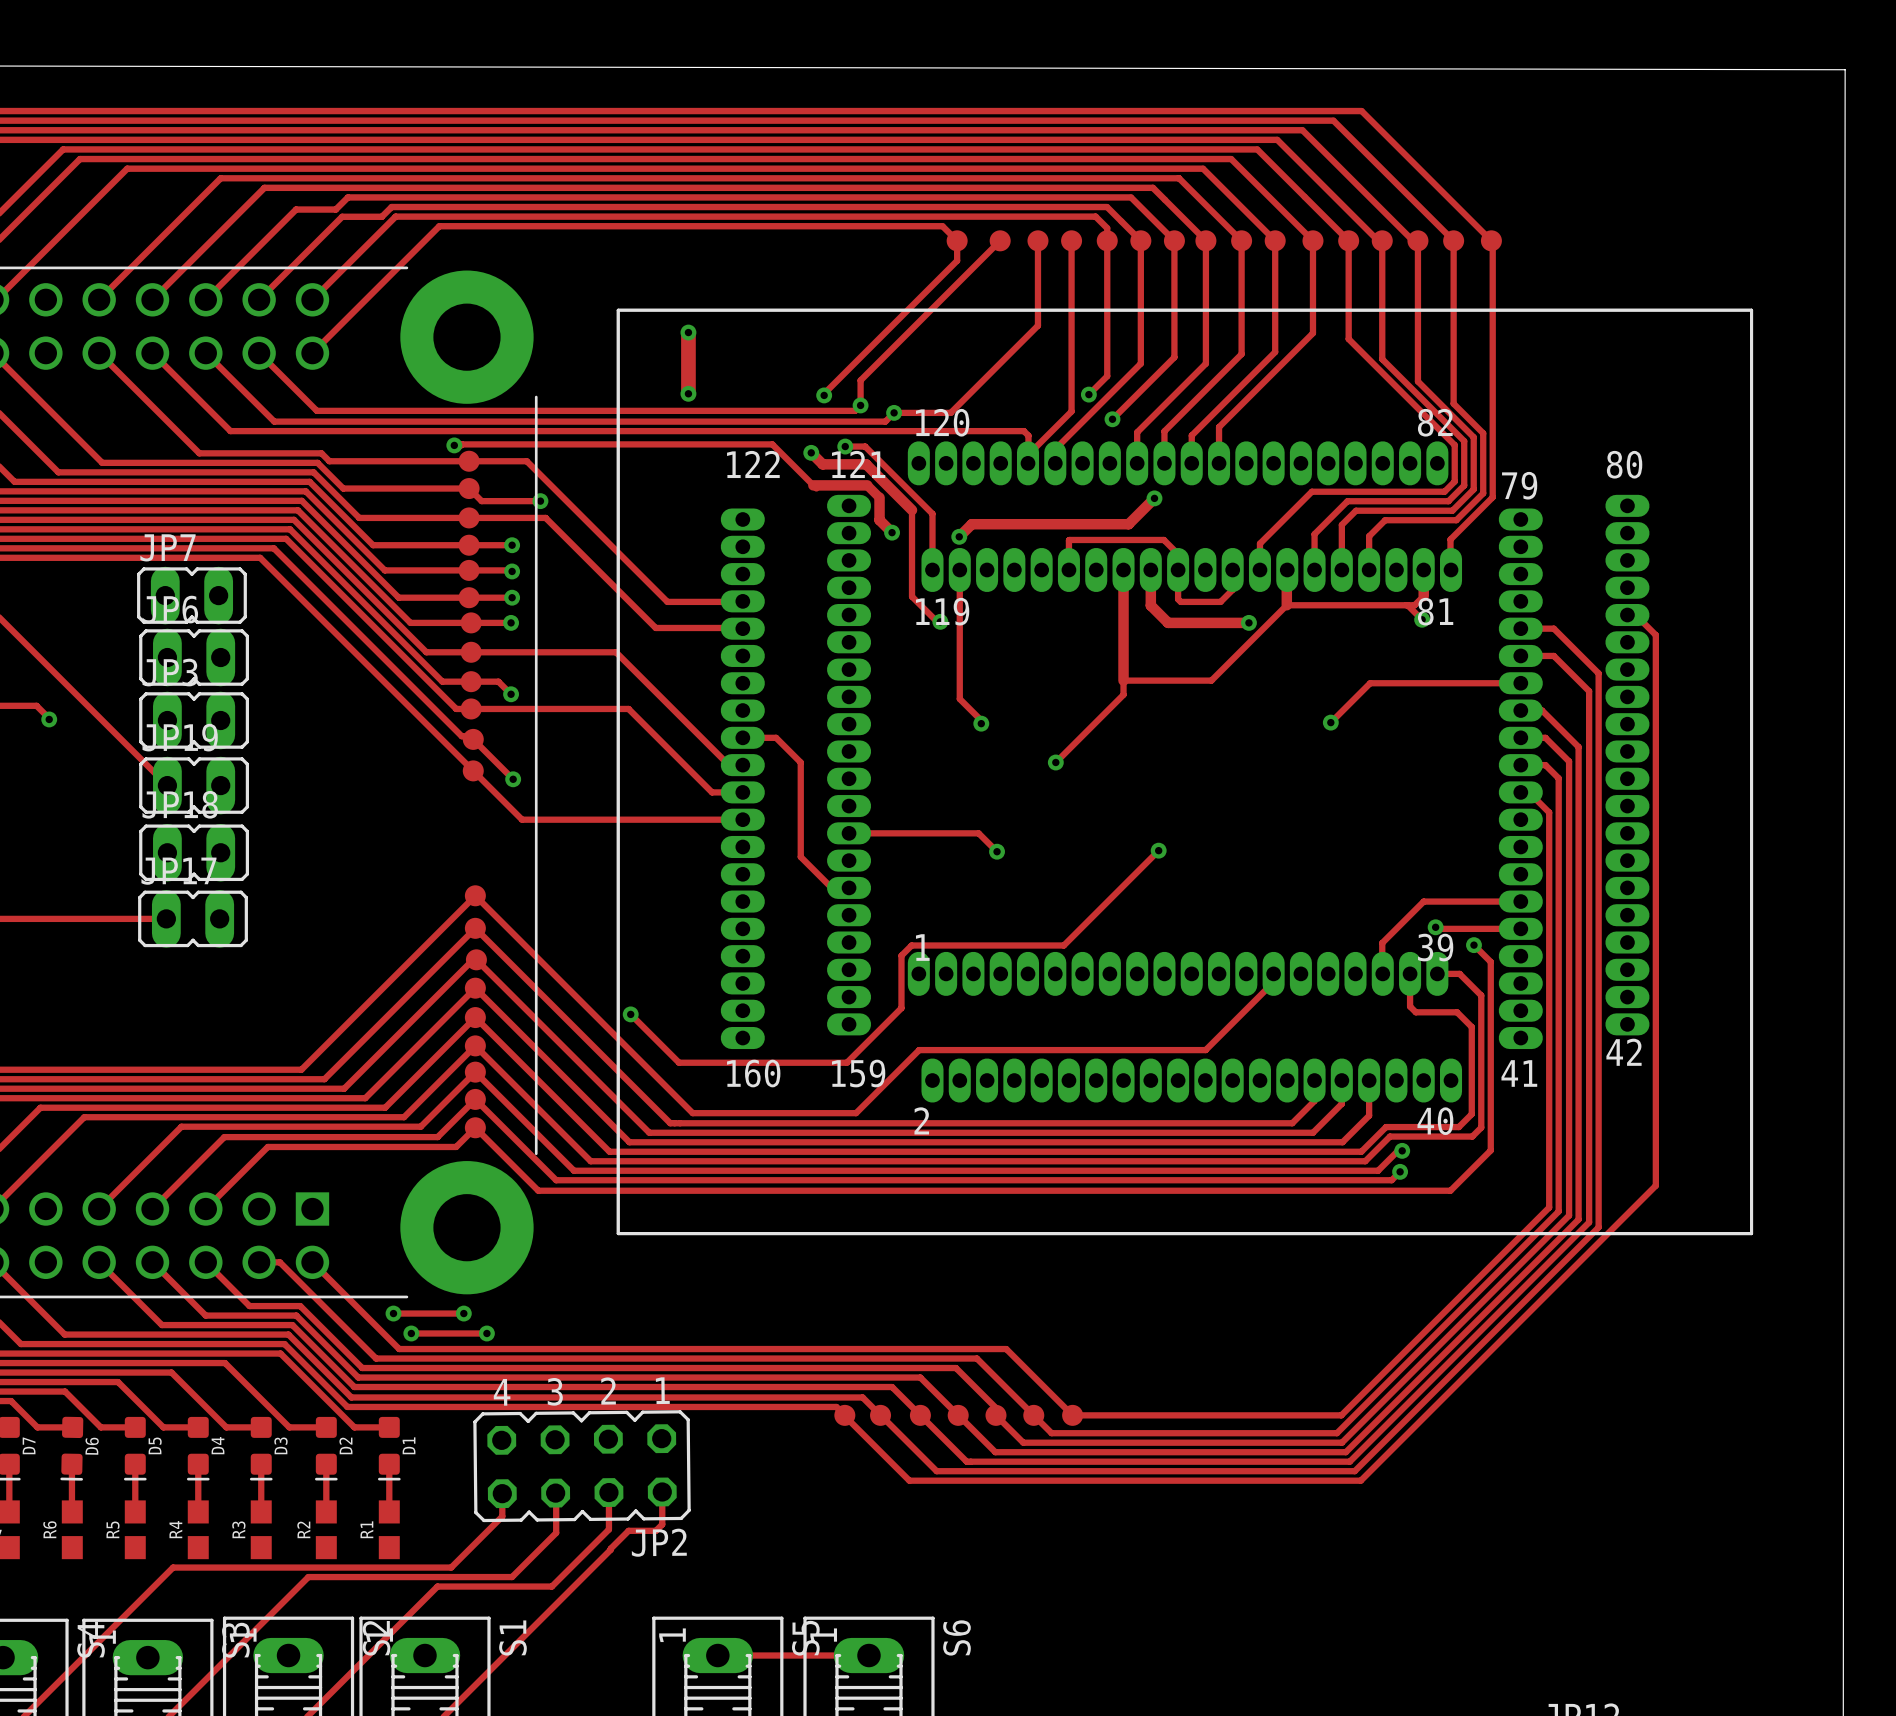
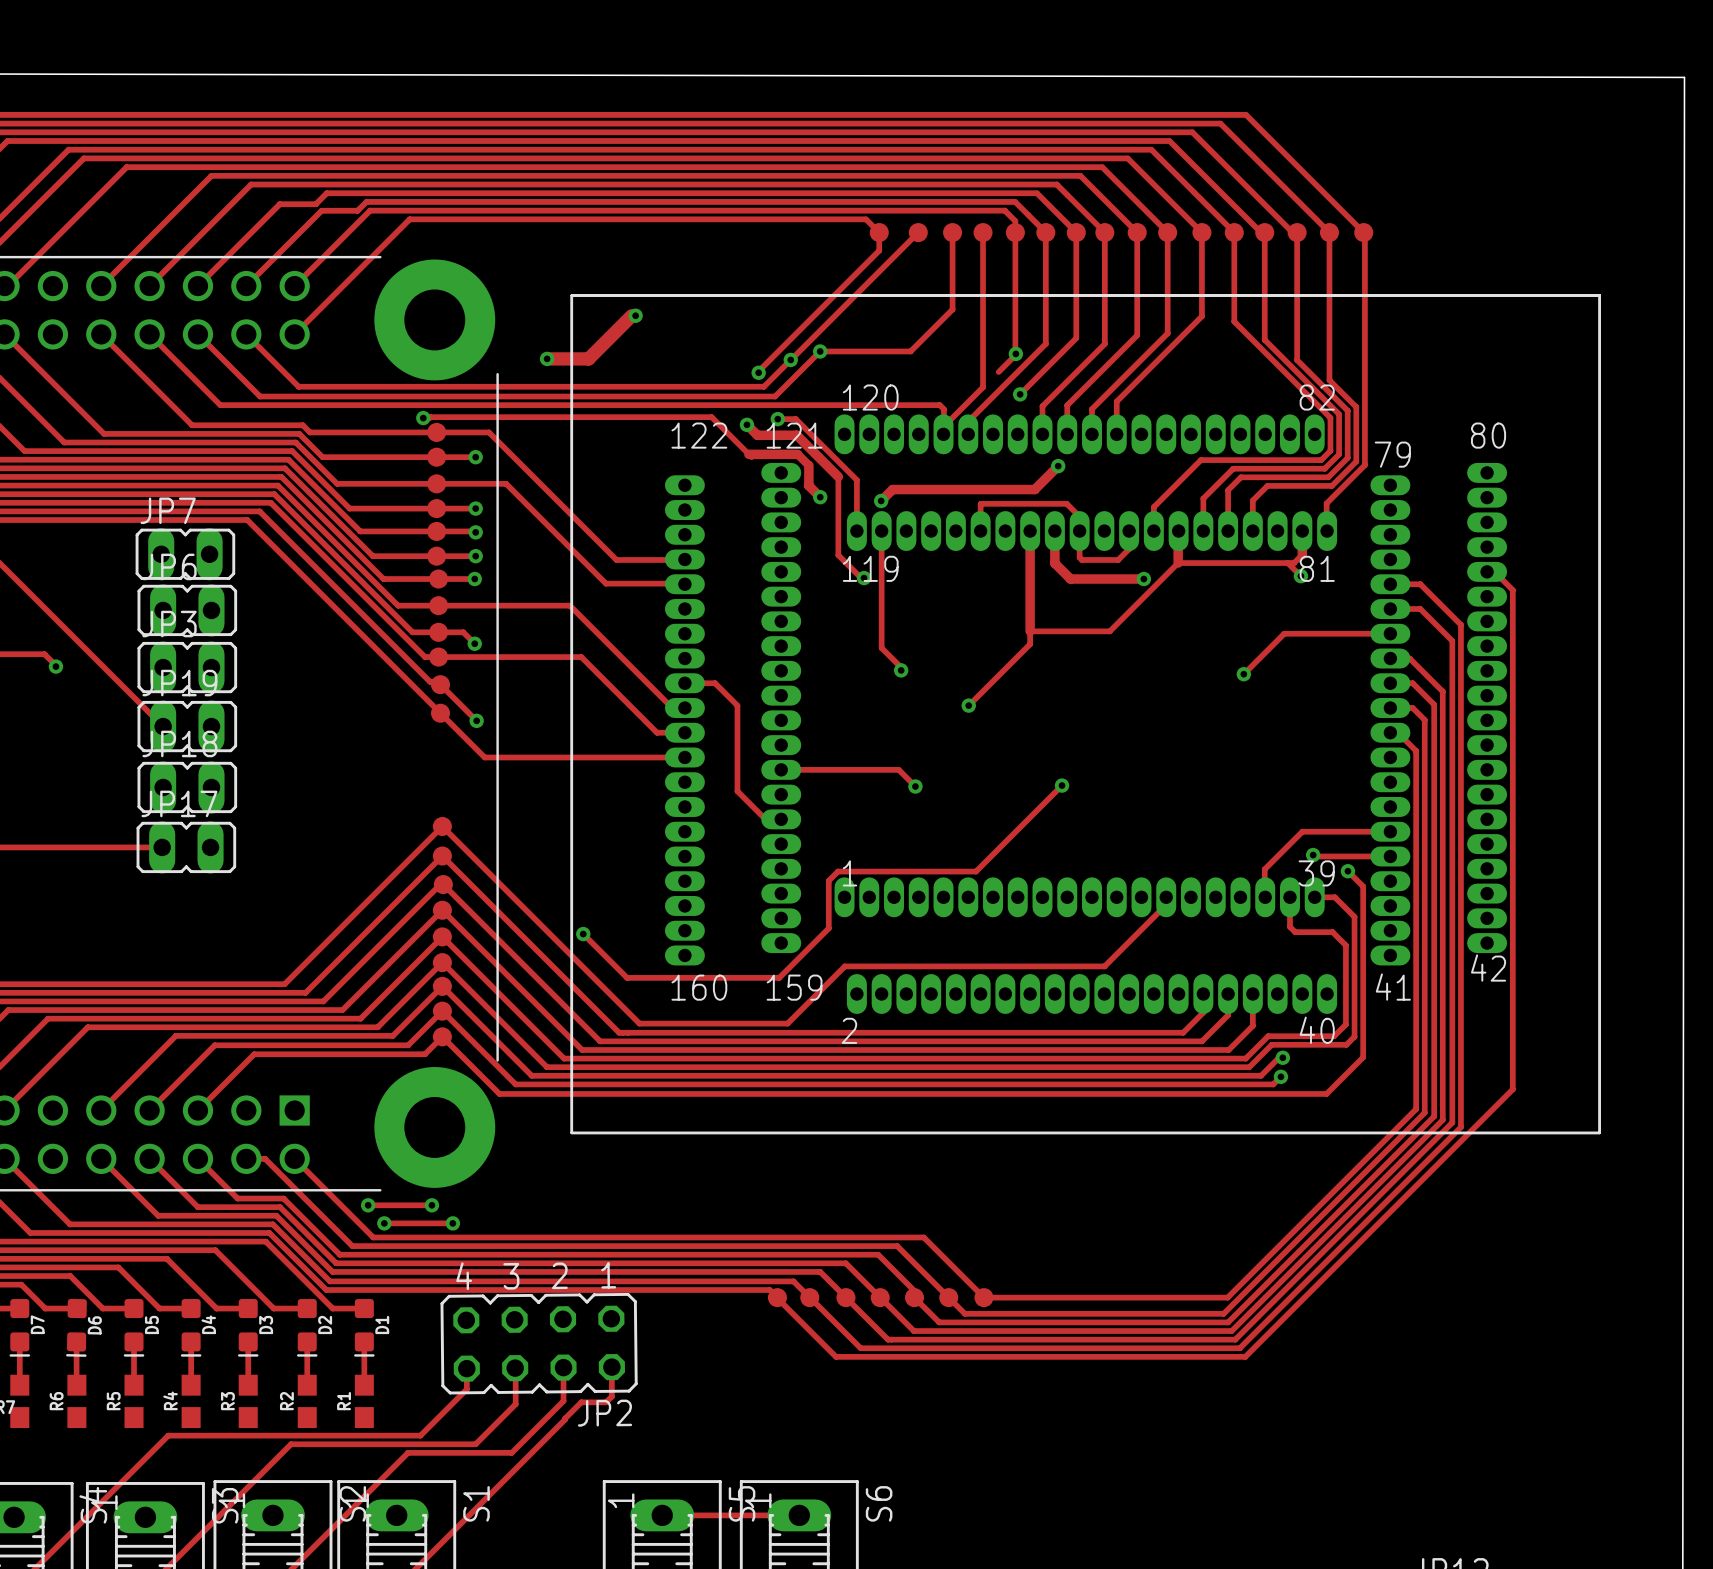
track: (688, 332) (688, 393) -> (635, 315) (631, 315) (588, 358) (547, 358)
via: none -> (820, 351)
track: (991, 371) (950, 412) (894, 412) (885, 421) (842, 421) -> (910, 351) (820, 351) (775, 396)
via: none -> (547, 358)
track: (860, 380) (860, 405) (855, 410) (829, 410) -> (790, 359) (763, 386)
via: none -> (790, 359)
via: (688, 393) -> none
via position: (1088, 394) -> (1015, 353)
via: (860, 405) -> none
via: (894, 412) -> none
track: (469, 488) (481, 501) (540, 501) -> (436, 457) (475, 457)
via position: (540, 501) -> (475, 457)
track: (1403, 683) (1370, 683) (1330, 722) -> (1284, 633) (1243, 674)
via position: (1330, 722) -> (1243, 674)

